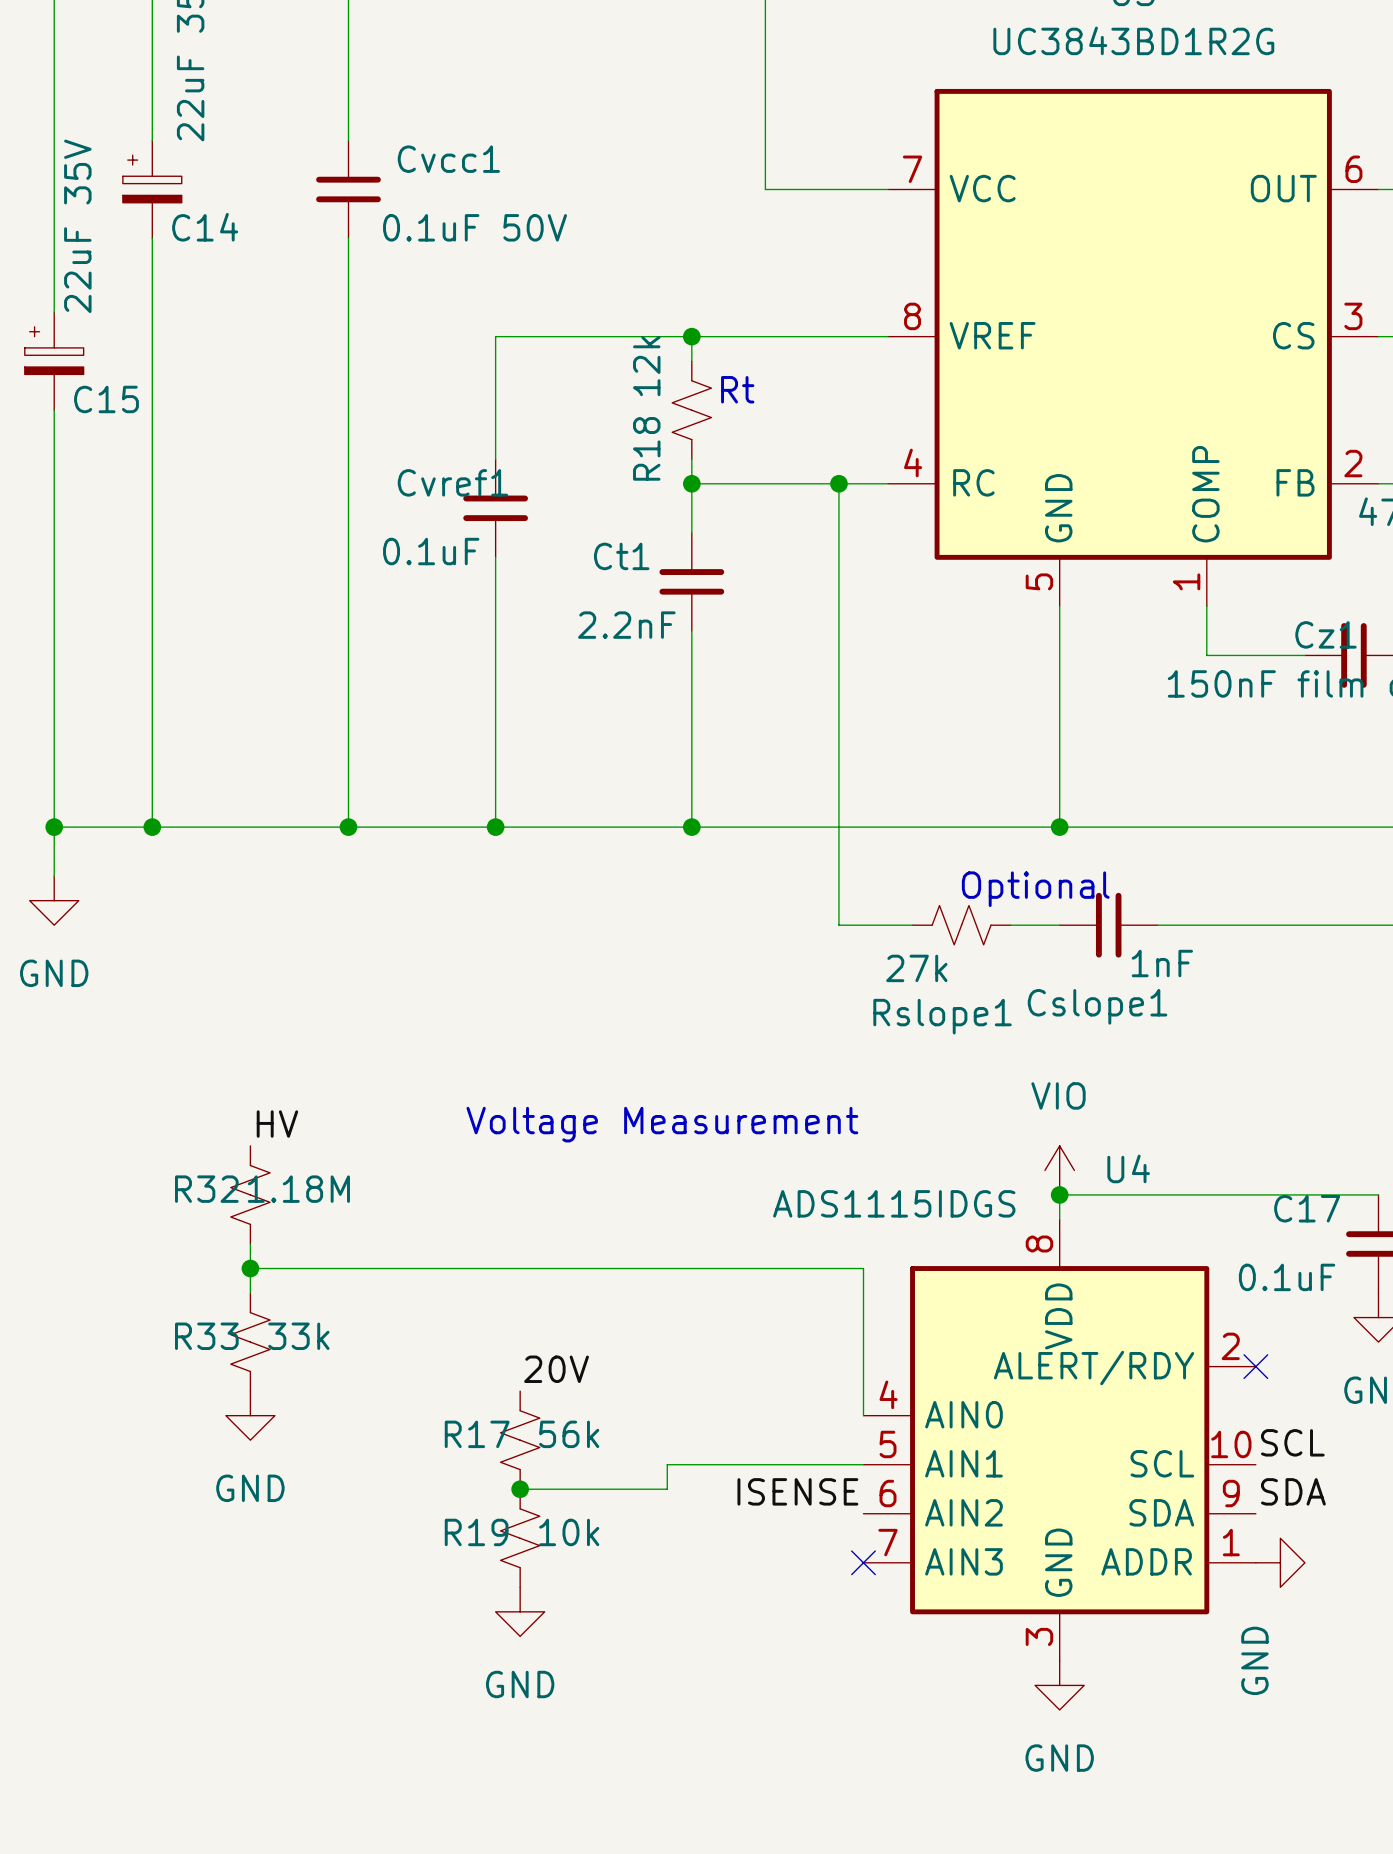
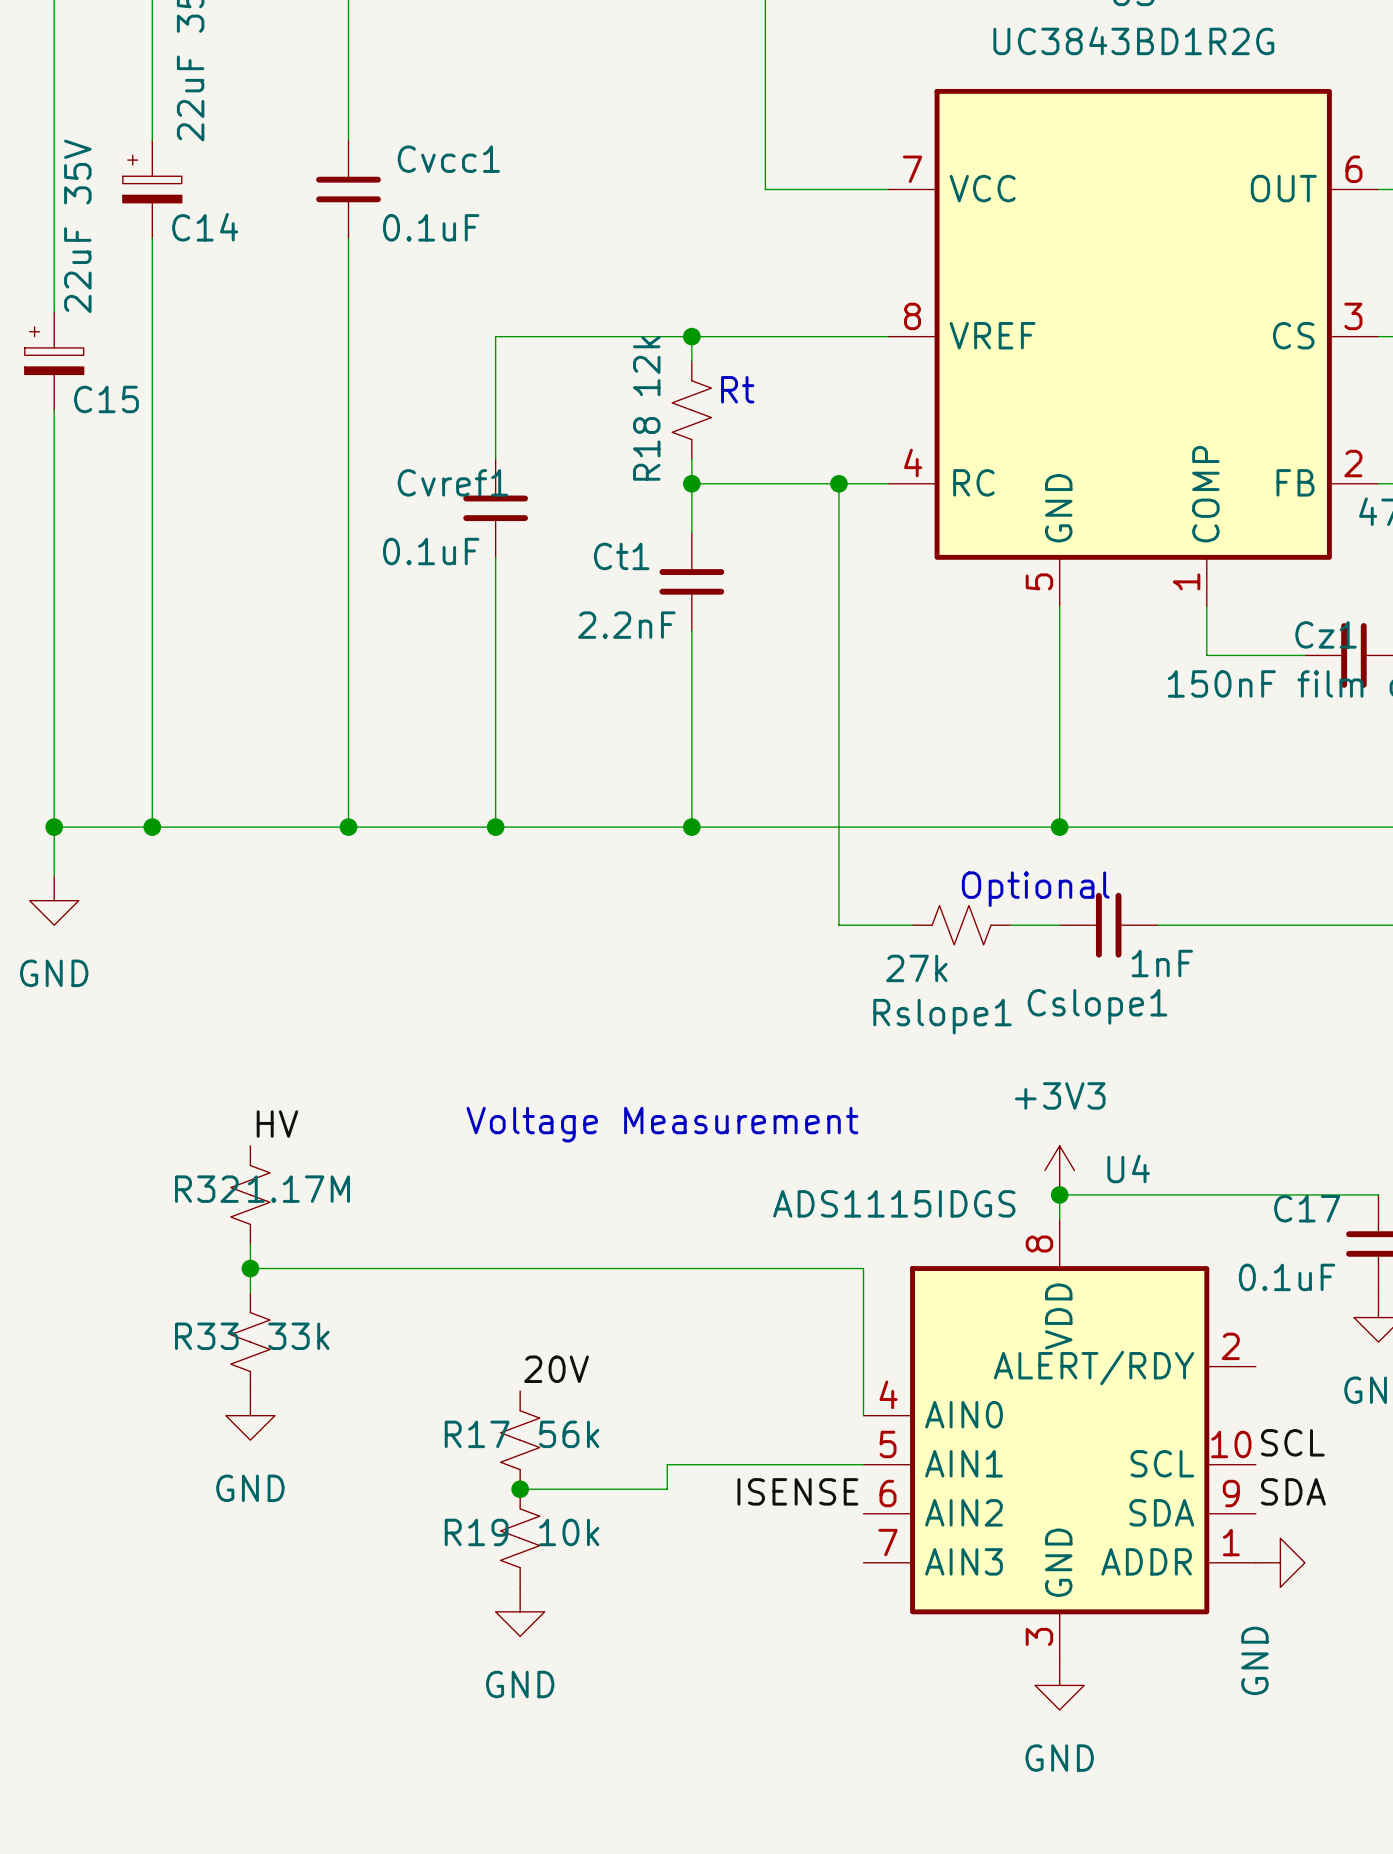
Cvcc1 value: 0.1uF 50V (475, 227) -> 0.1uF (431, 227)
power symbol: VIO (1059, 1170) -> +3V3 (1059, 1170)
R32 value: 1.18M (298, 1189) -> 1.17M (298, 1189)
no-connect mark: (1255, 1366) -> none
no-connect mark: (863, 1562) -> none

